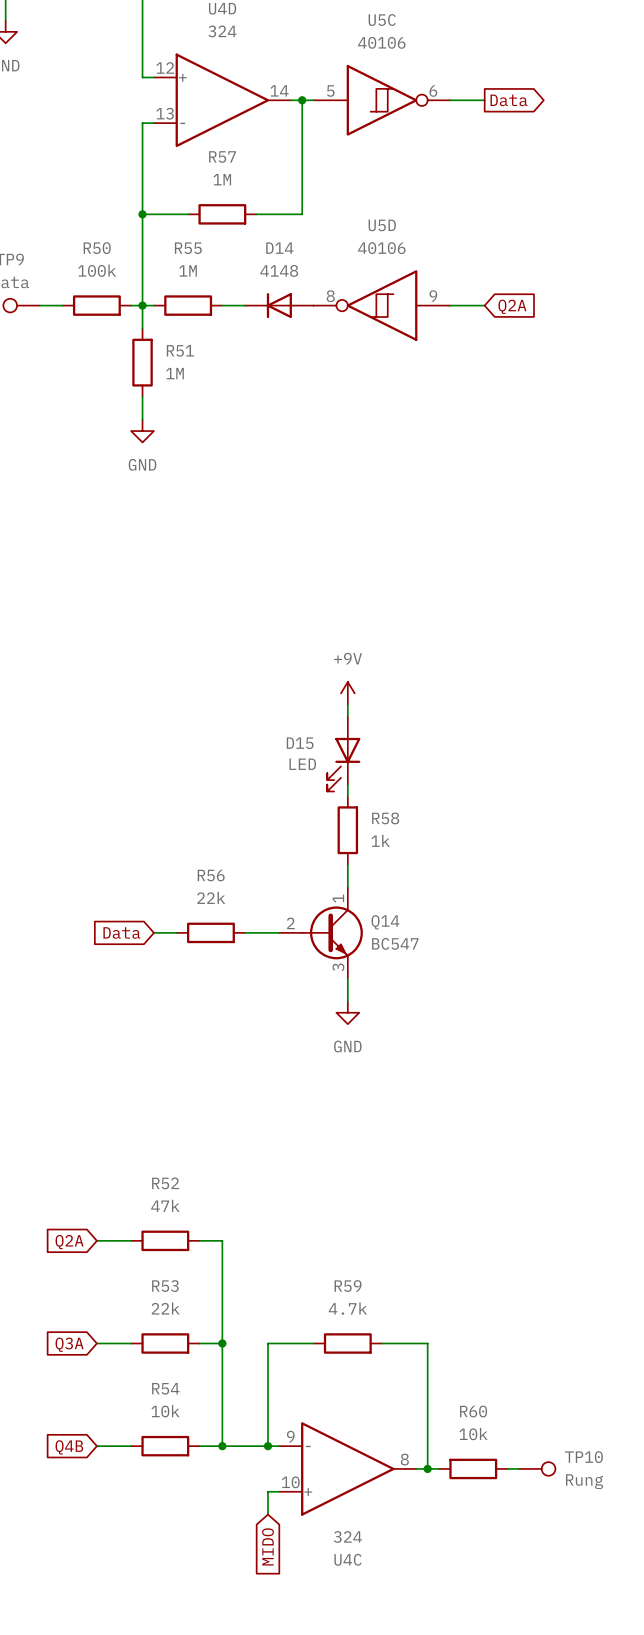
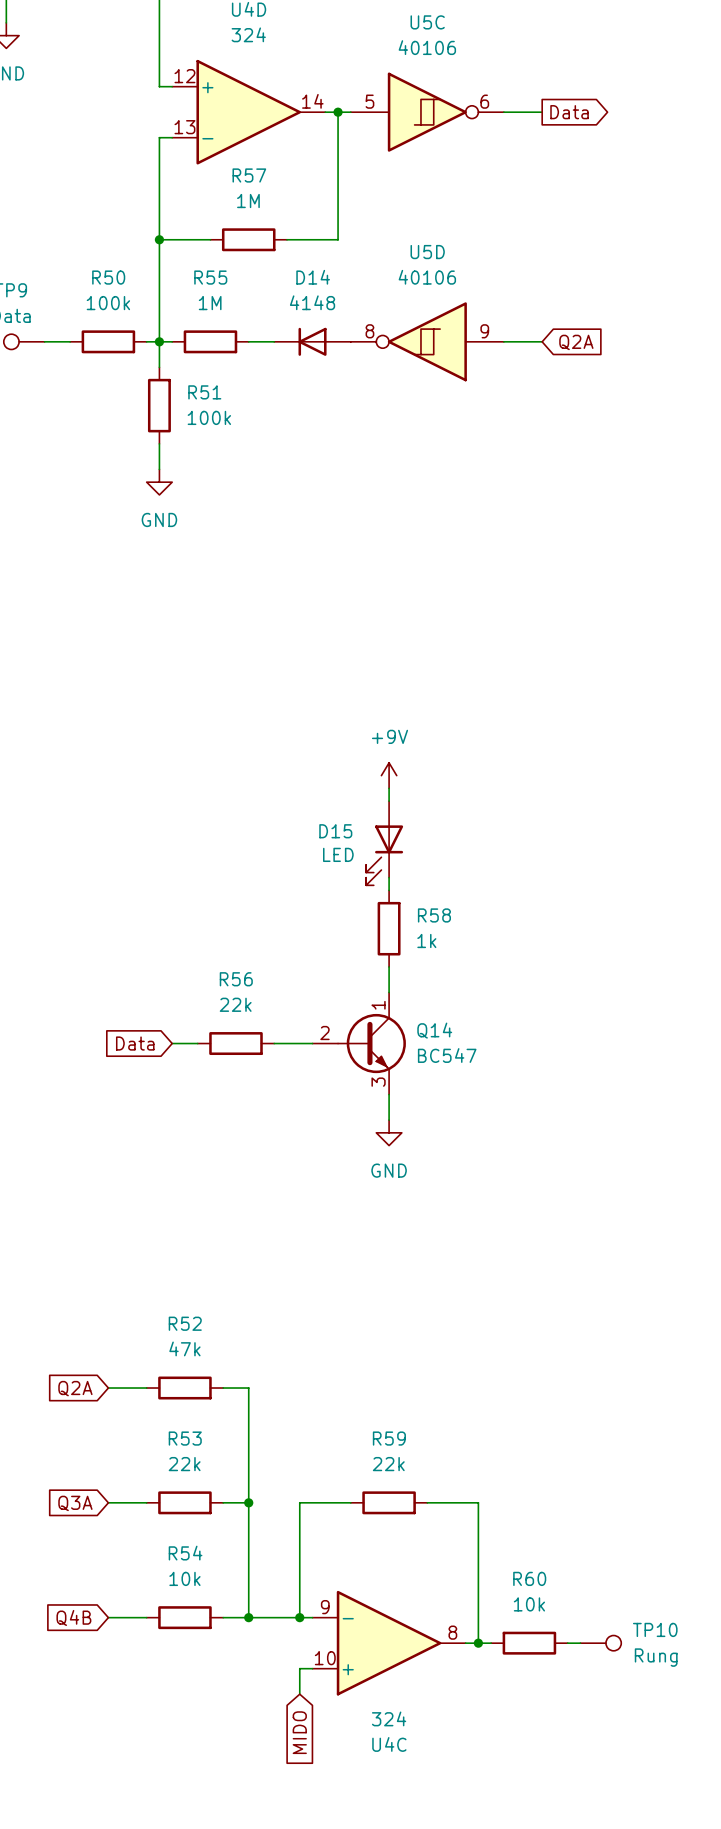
R51 value: 1M (175, 373) -> 100k (209, 417)
R59 value: 4.7k (347, 1308) -> 22k (388, 1464)

